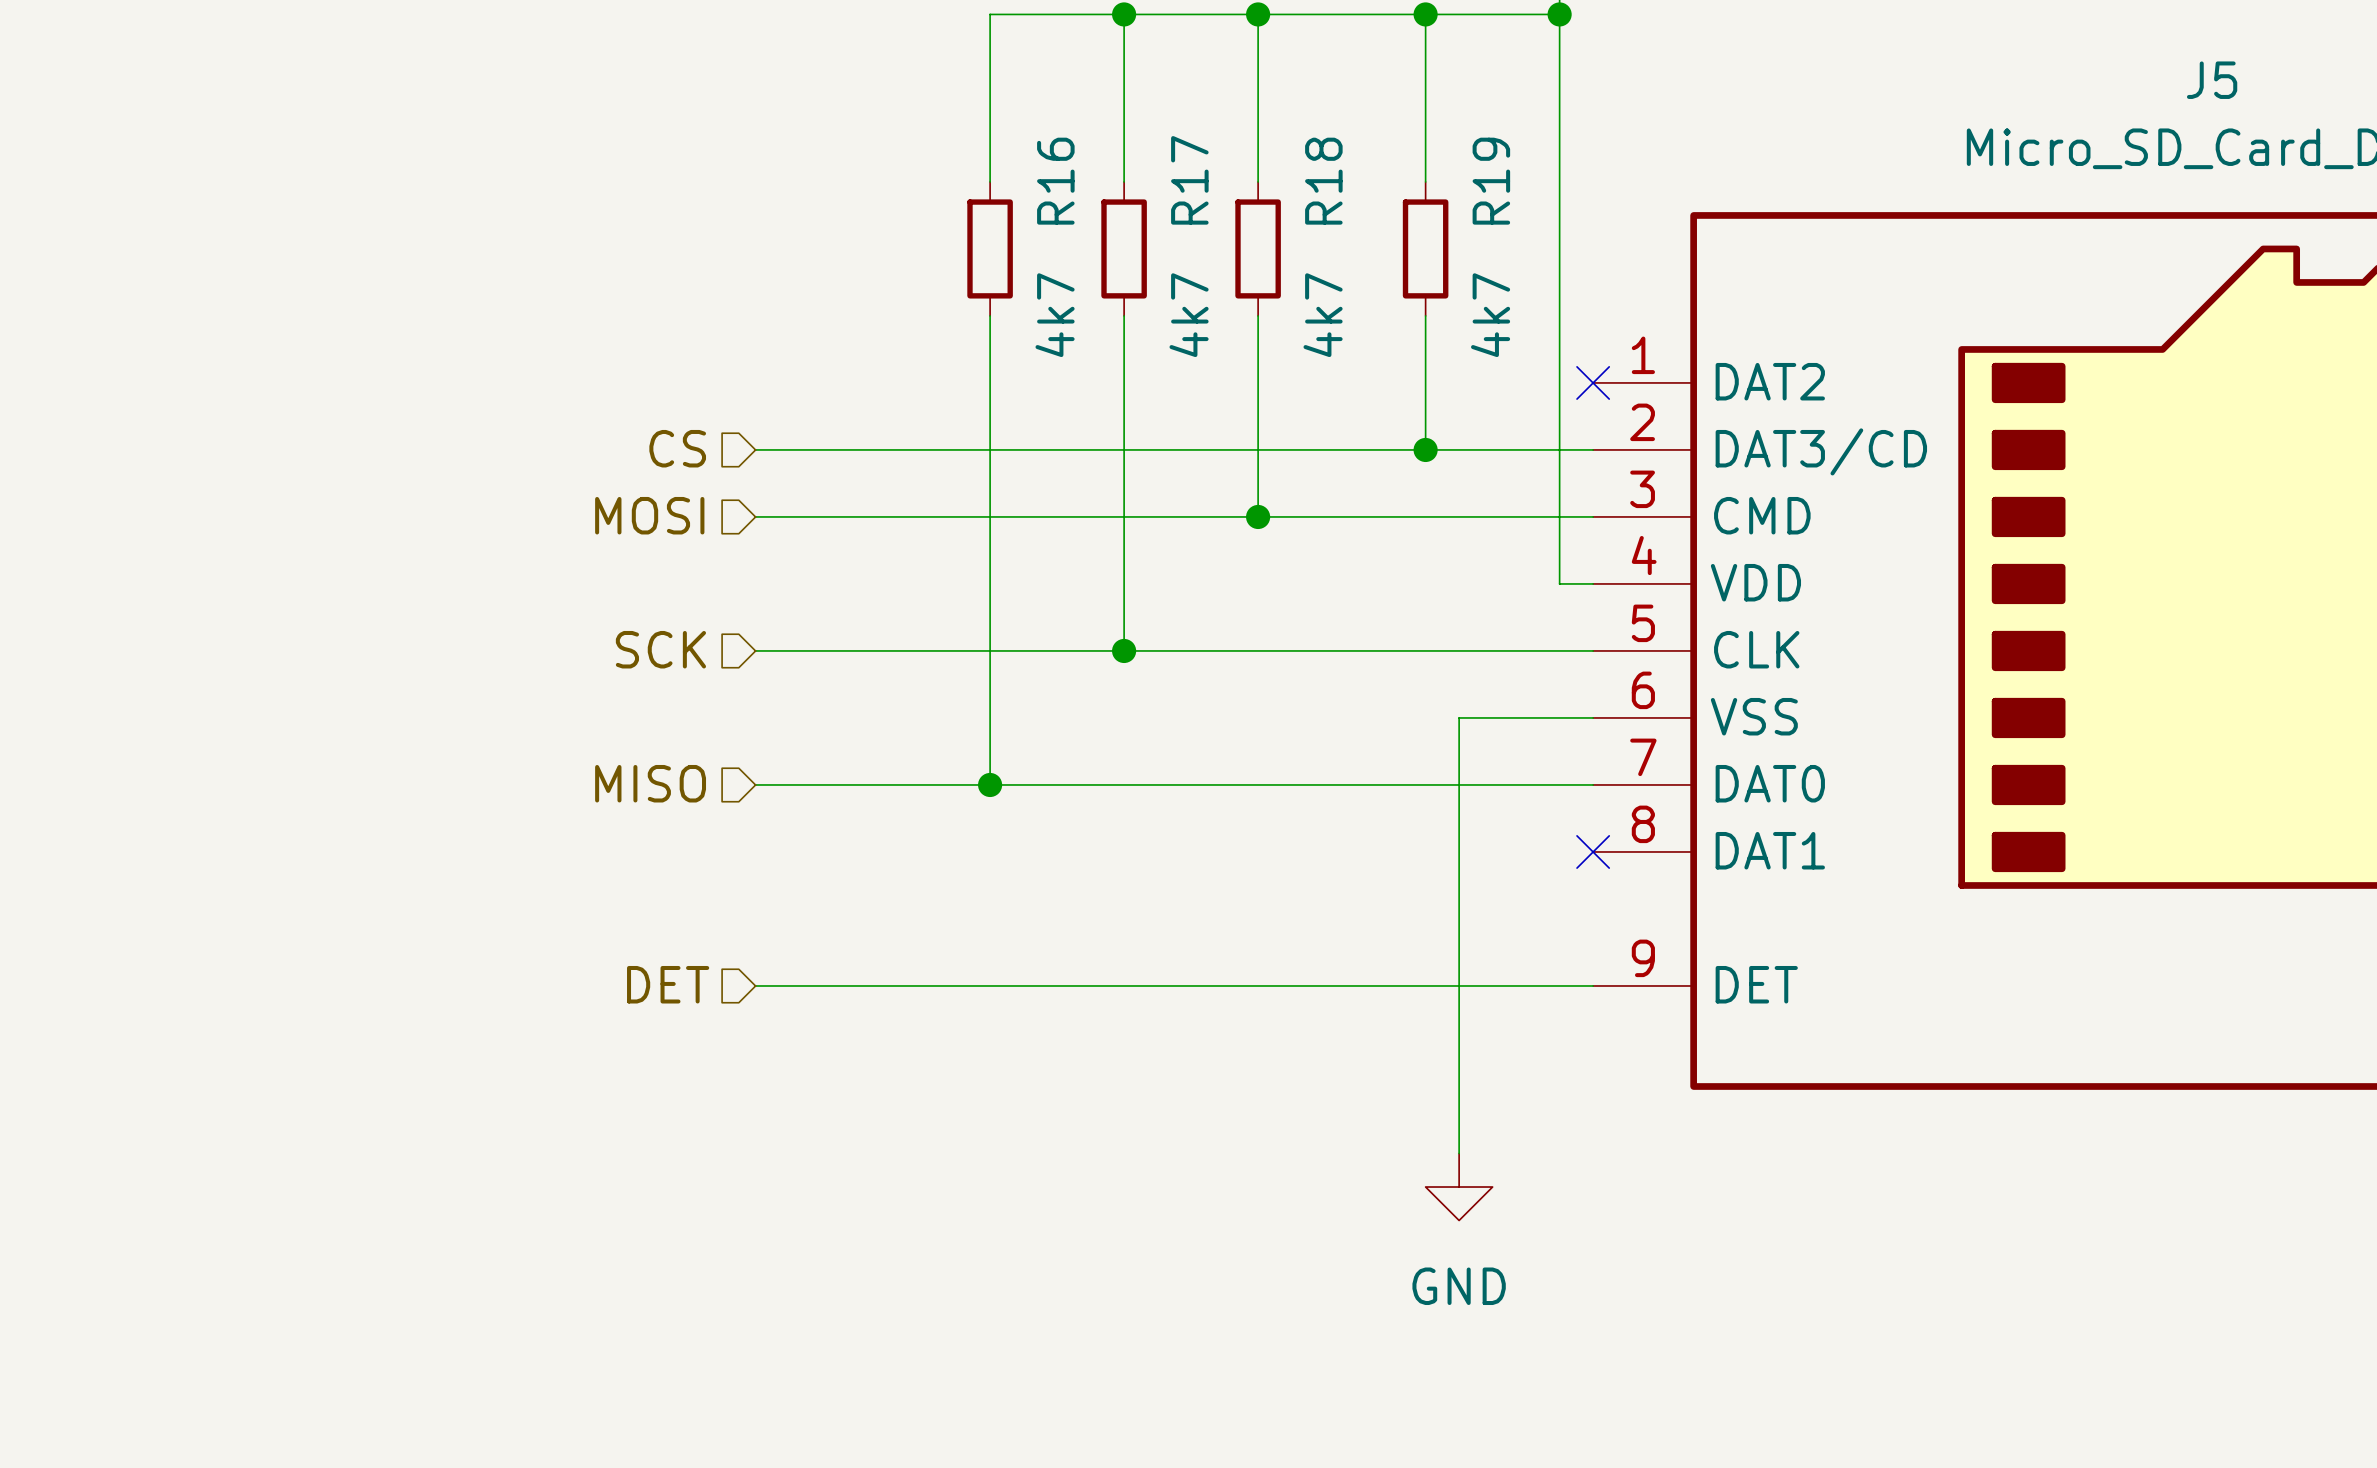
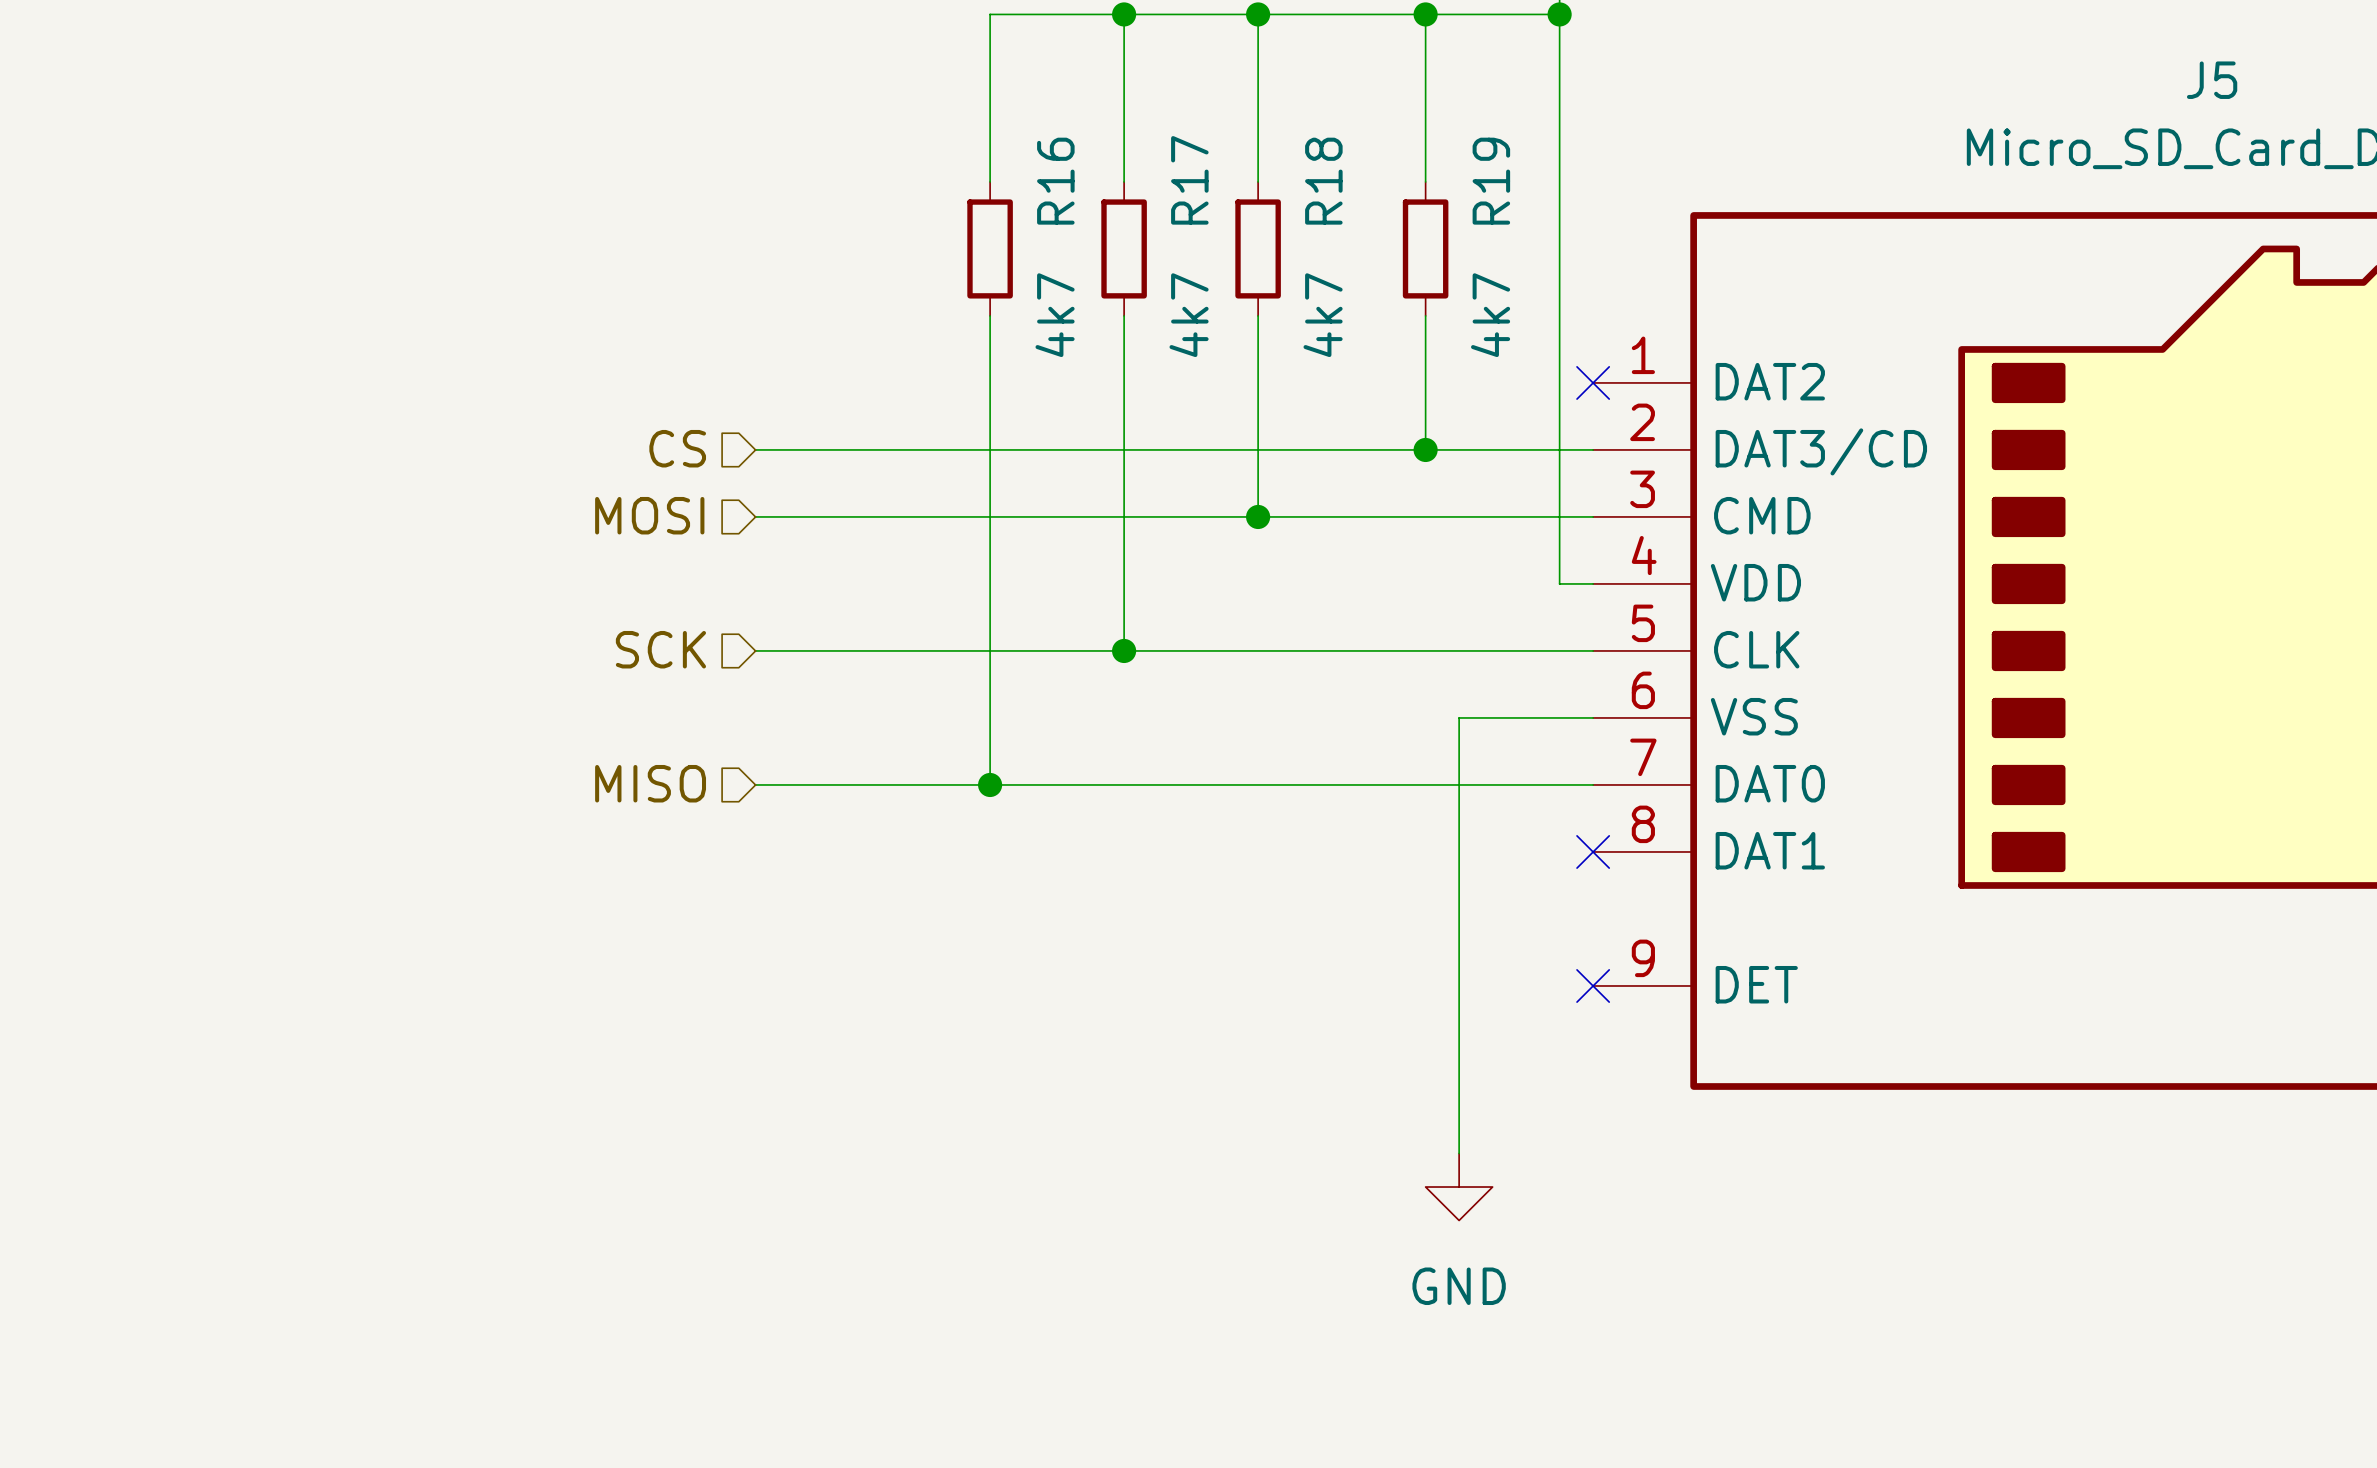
hierarchical label: DET (668, 984) -> none
wire: (755, 985) (1593, 985) -> none
no-connect mark: none -> (1593, 985)

